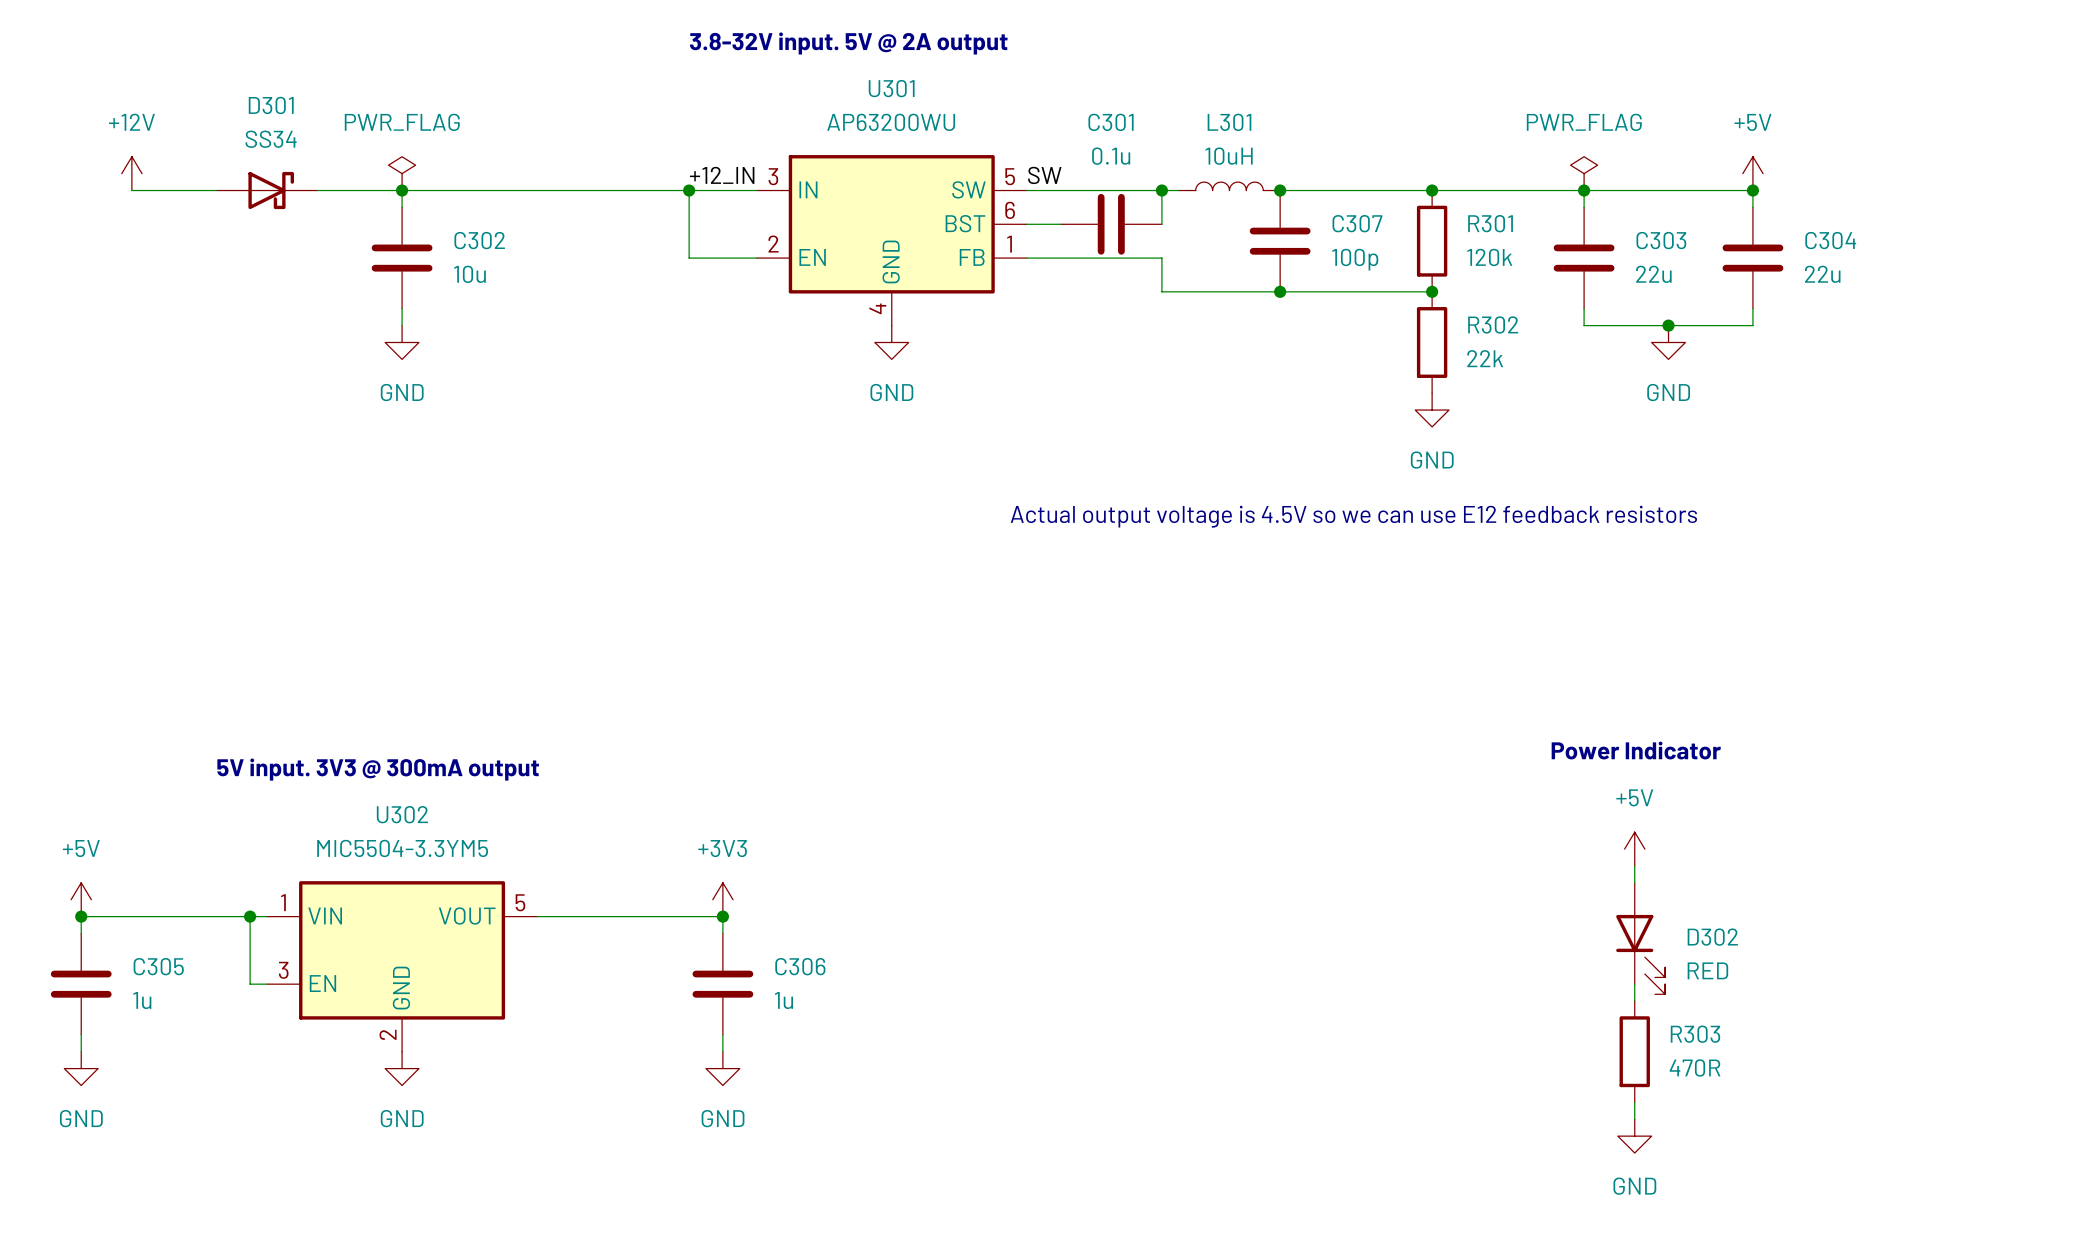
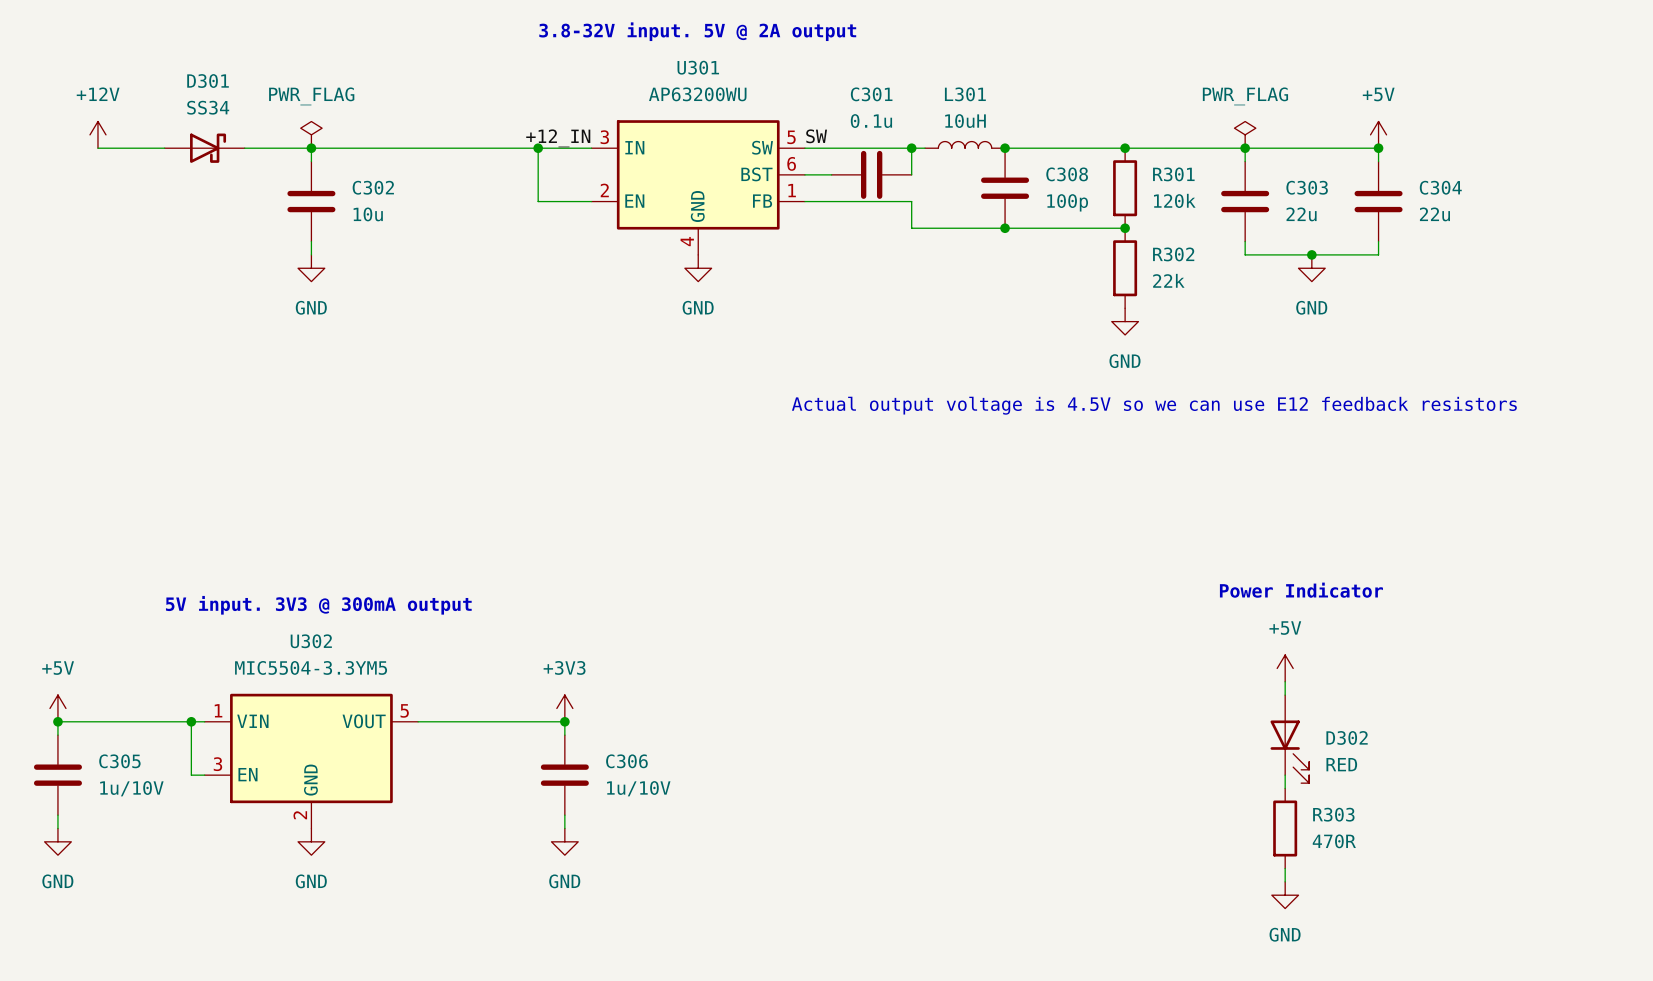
C307 name: C307 (1357, 223) -> C308 (1067, 174)
C305 value: 1u (142, 1000) -> 1u/10V (131, 788)
C306 value: 1u (783, 1000) -> 1u/10V (638, 788)

